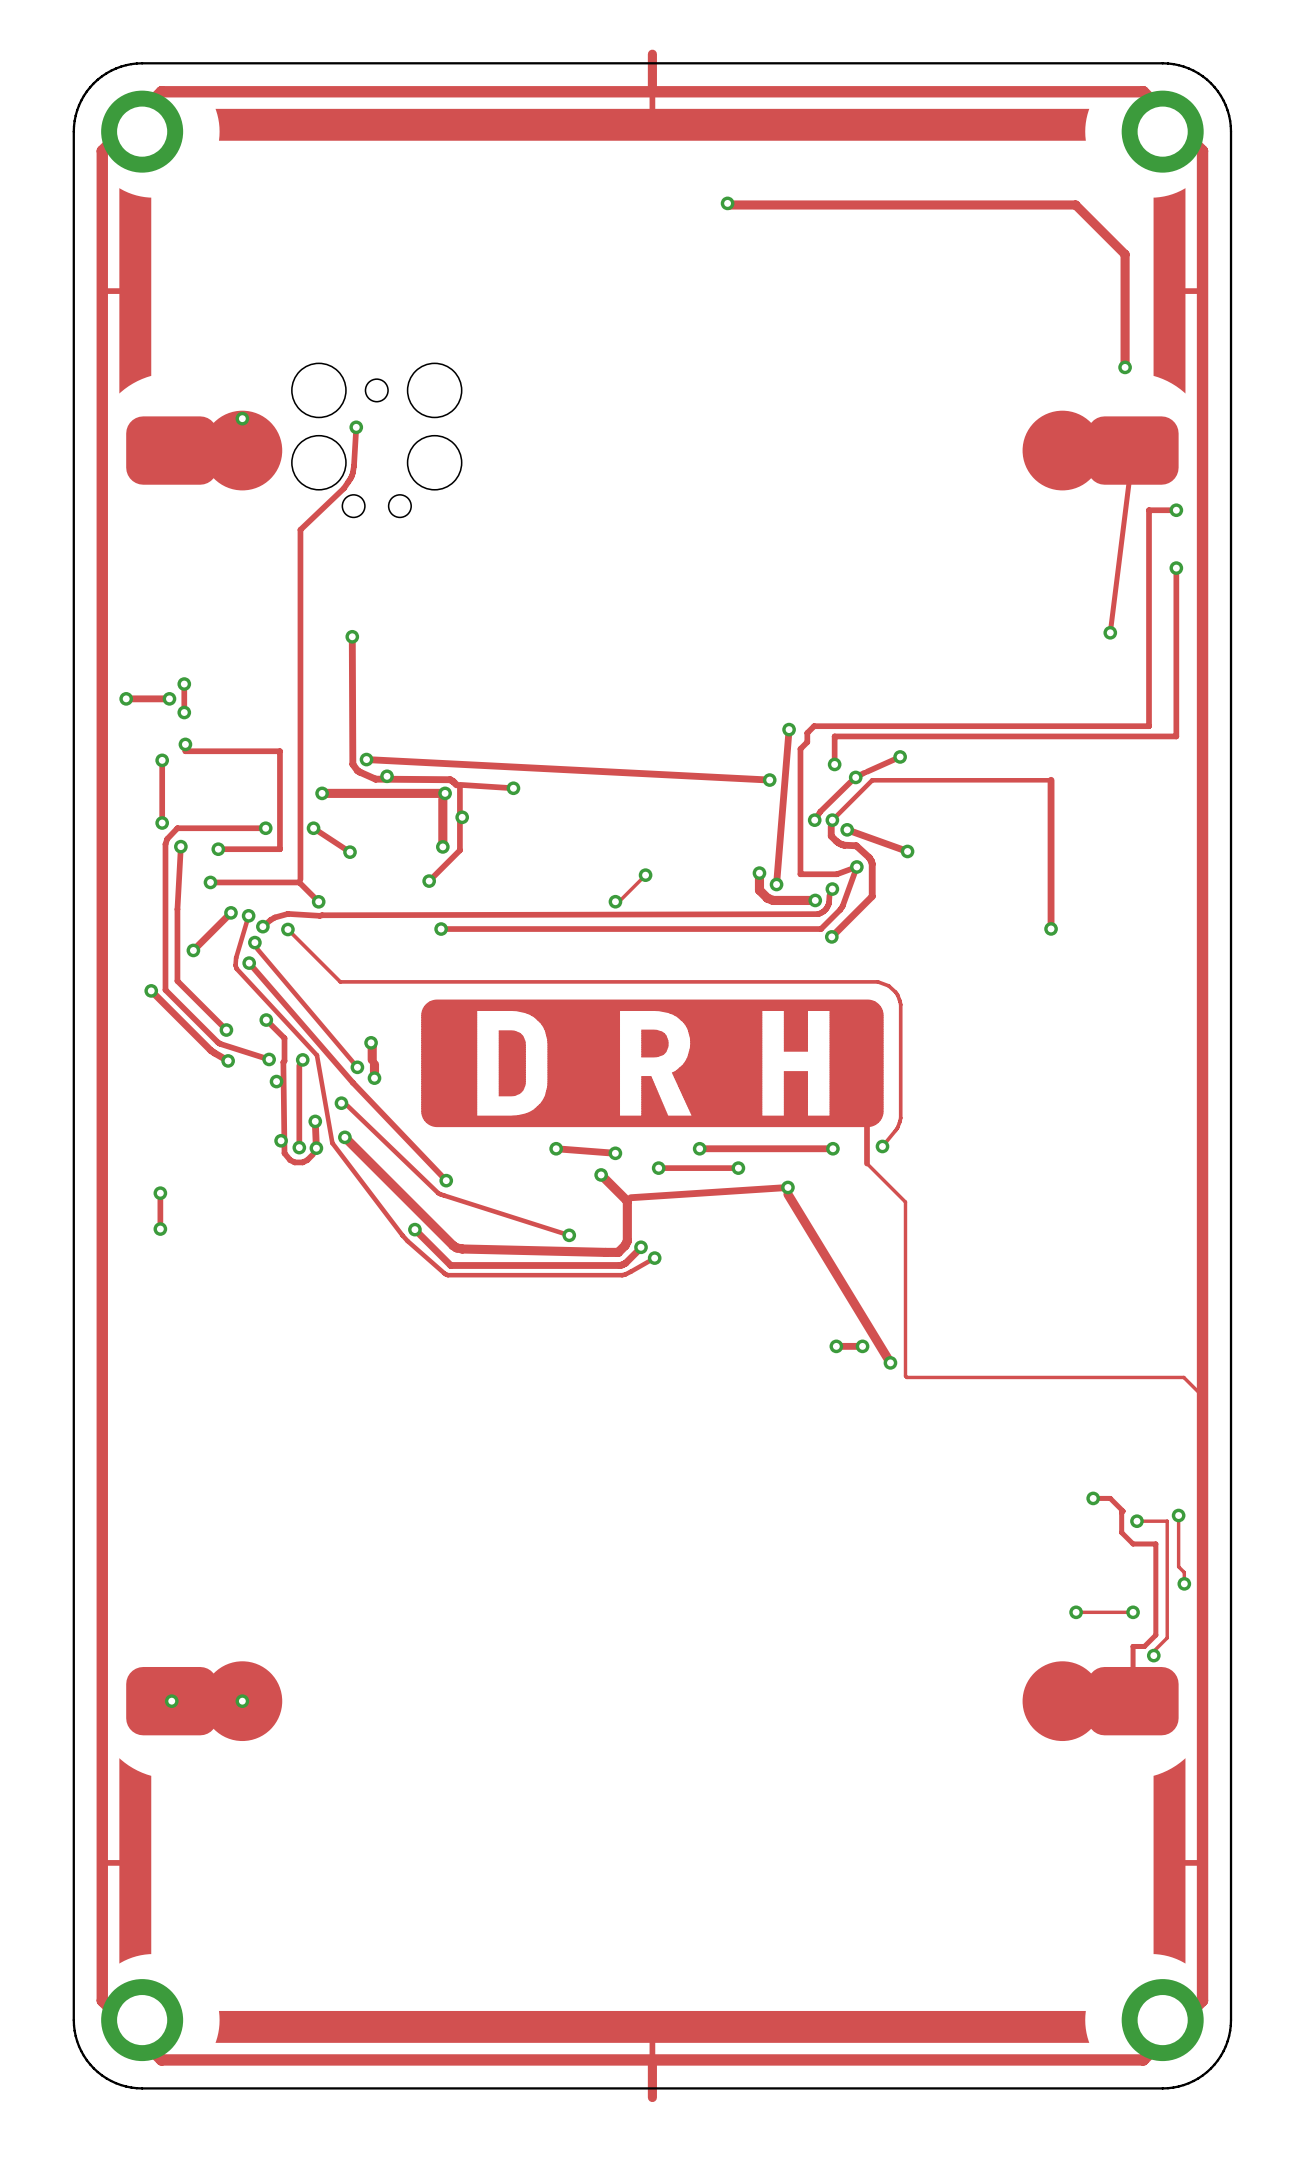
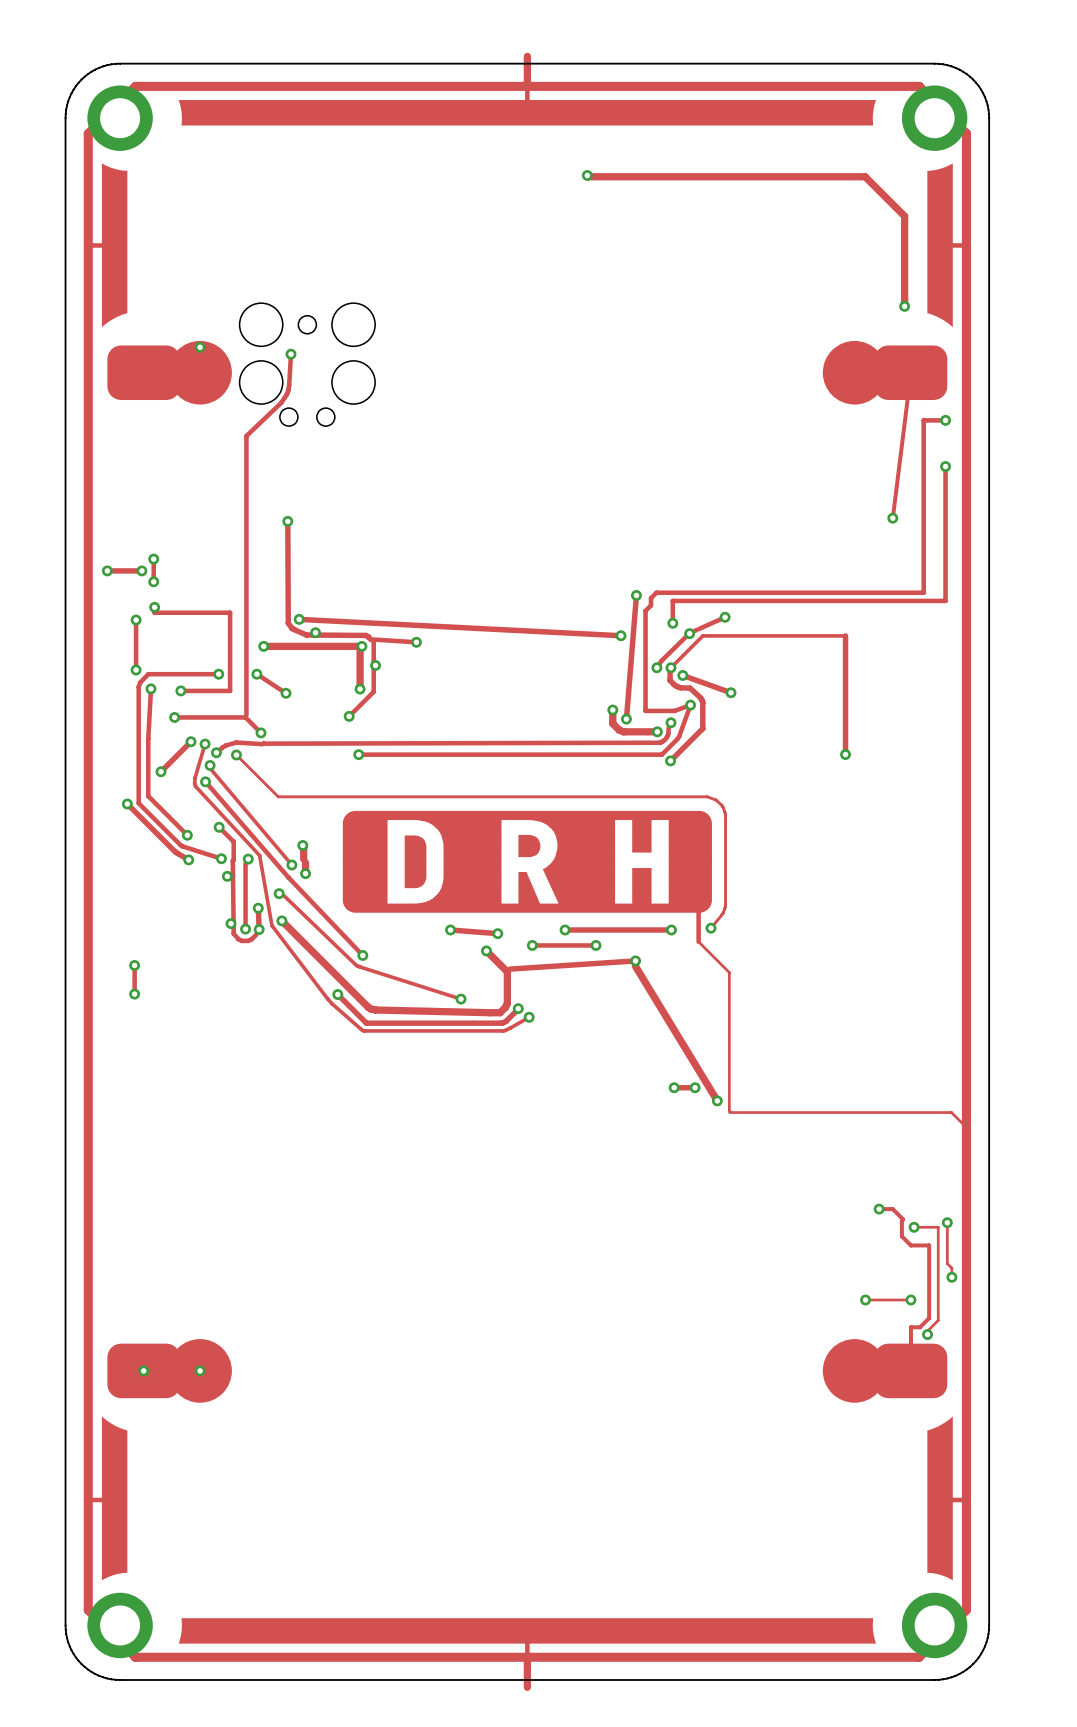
track: (645, 875) (619, 901) (615, 901) -> none
via: (645, 875) -> none
via: (615, 901) -> none

